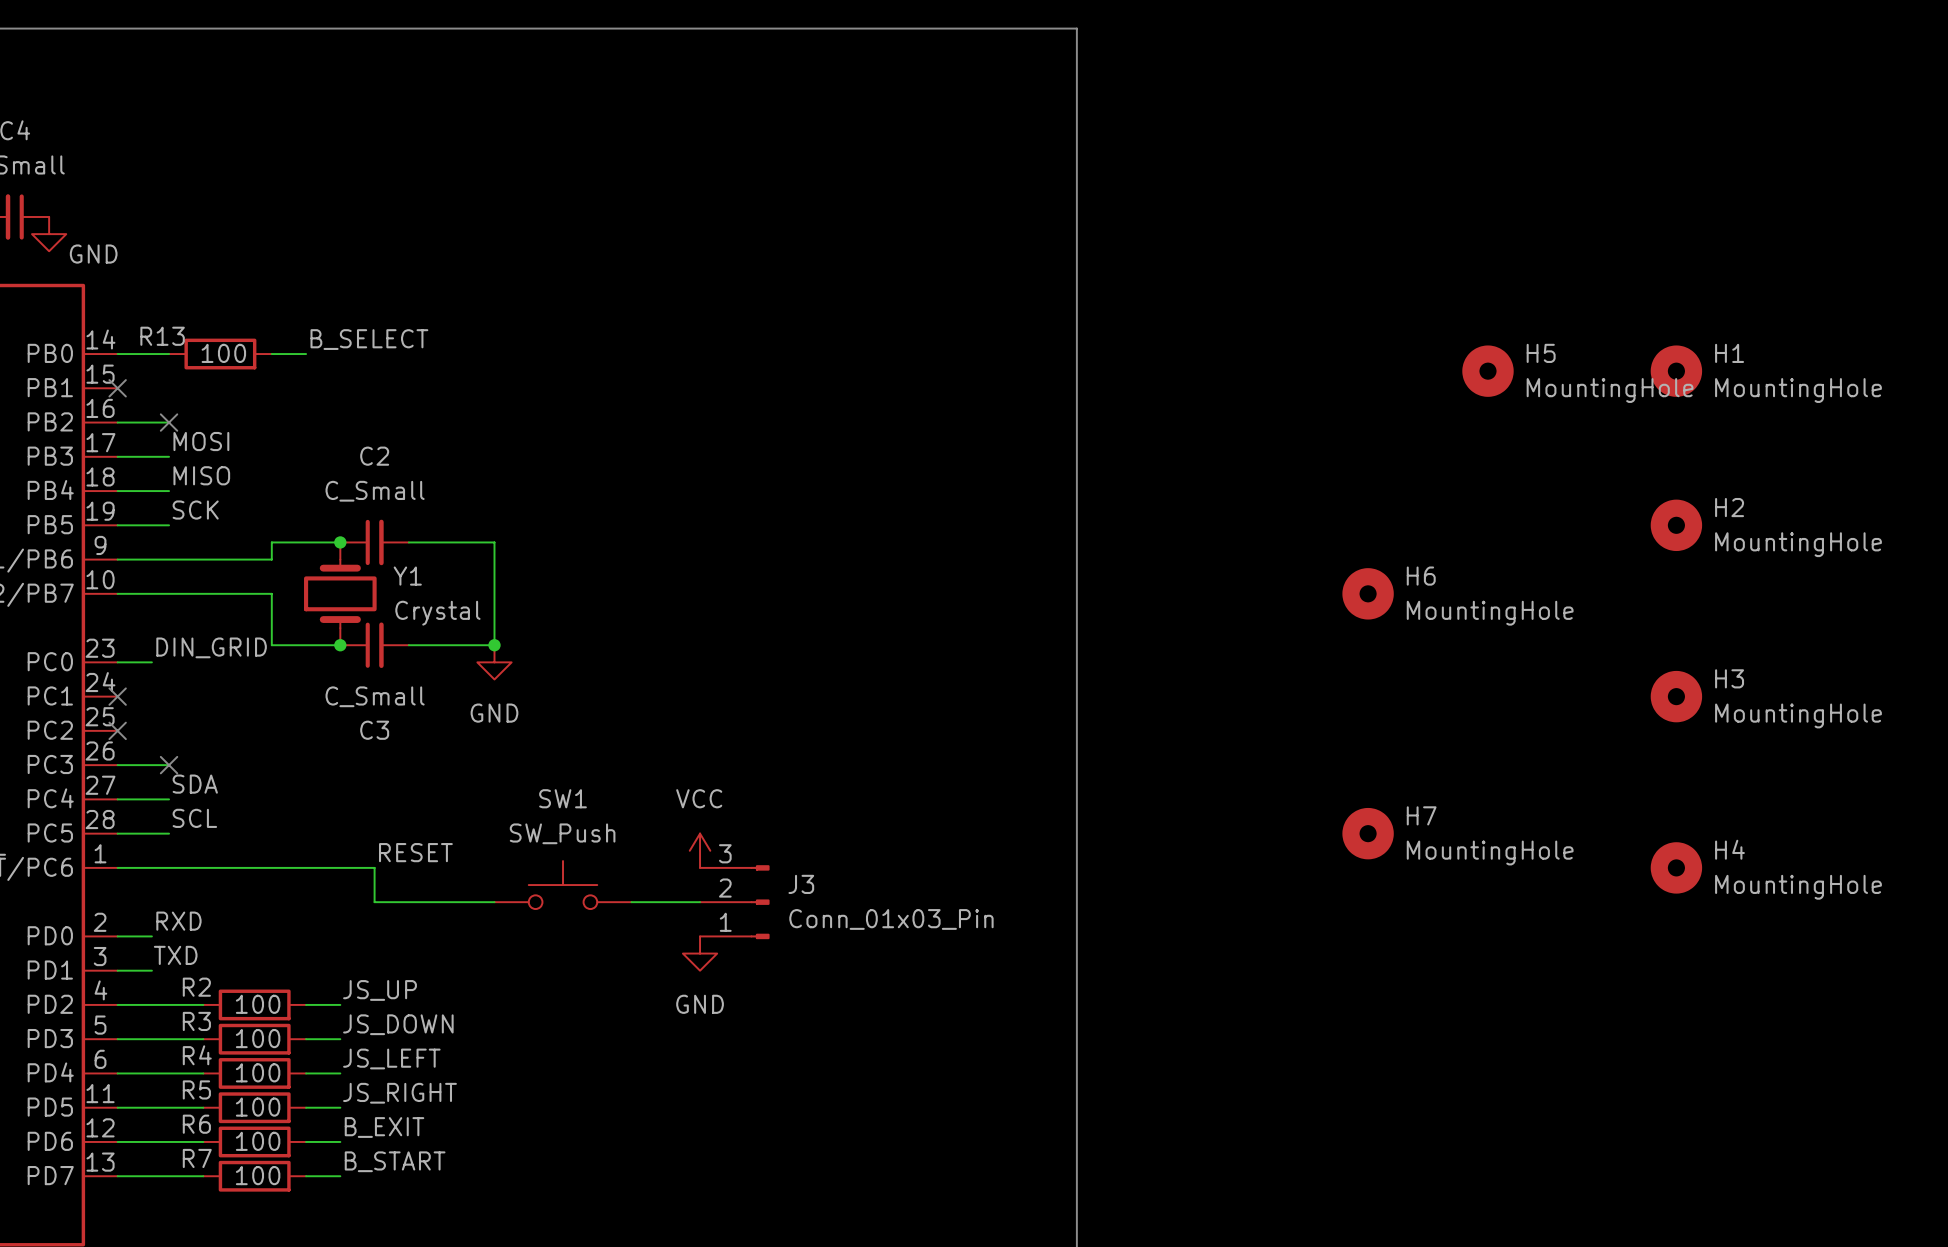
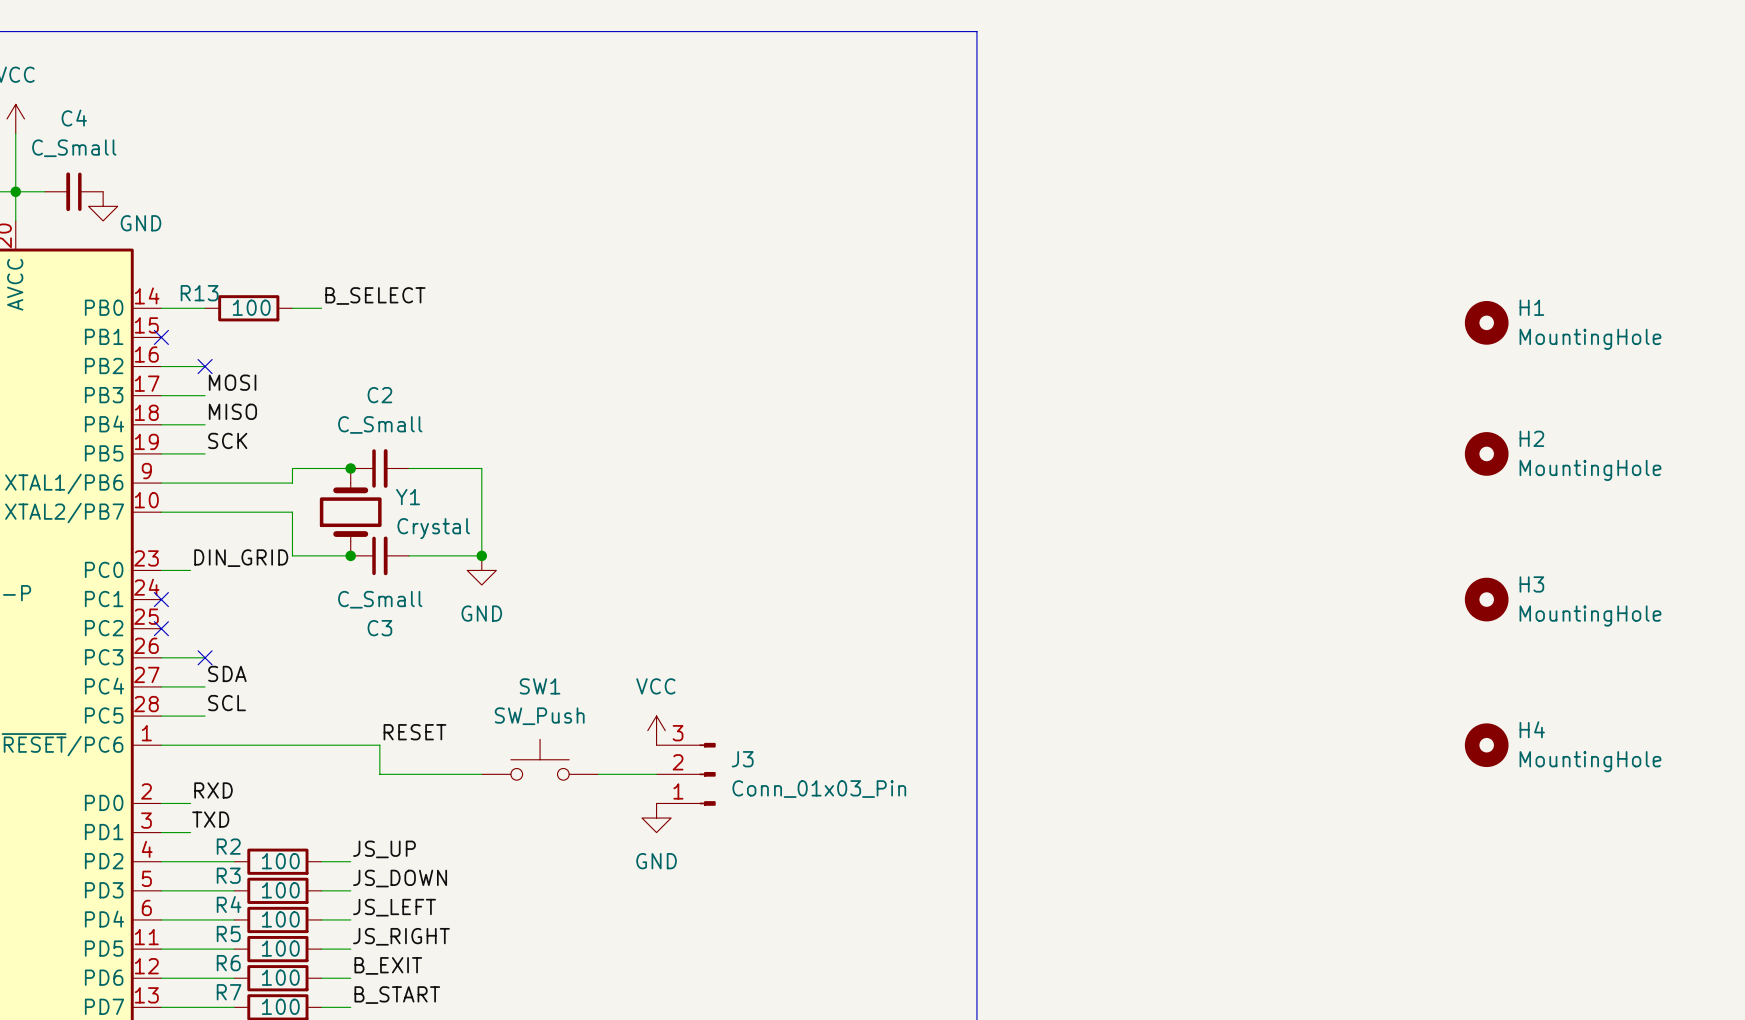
H5: MountingHole (1487, 371) -> none
H6: MountingHole (1368, 593) -> none
H7: MountingHole (1368, 833) -> none

